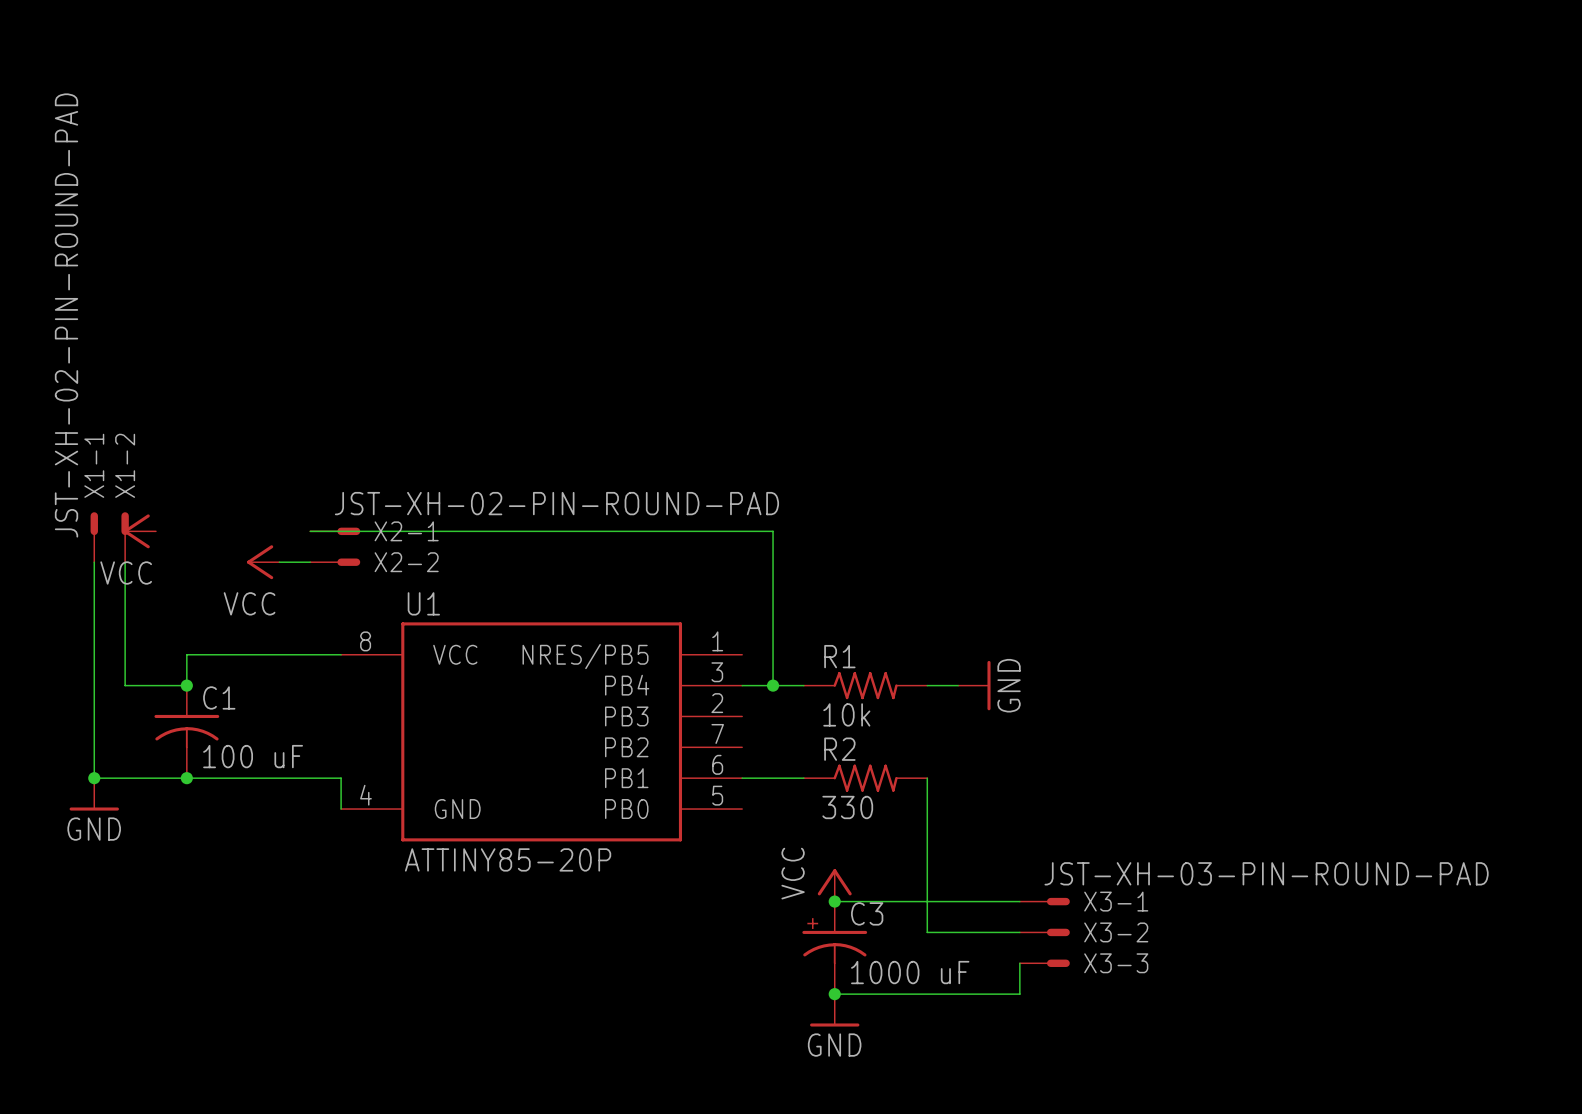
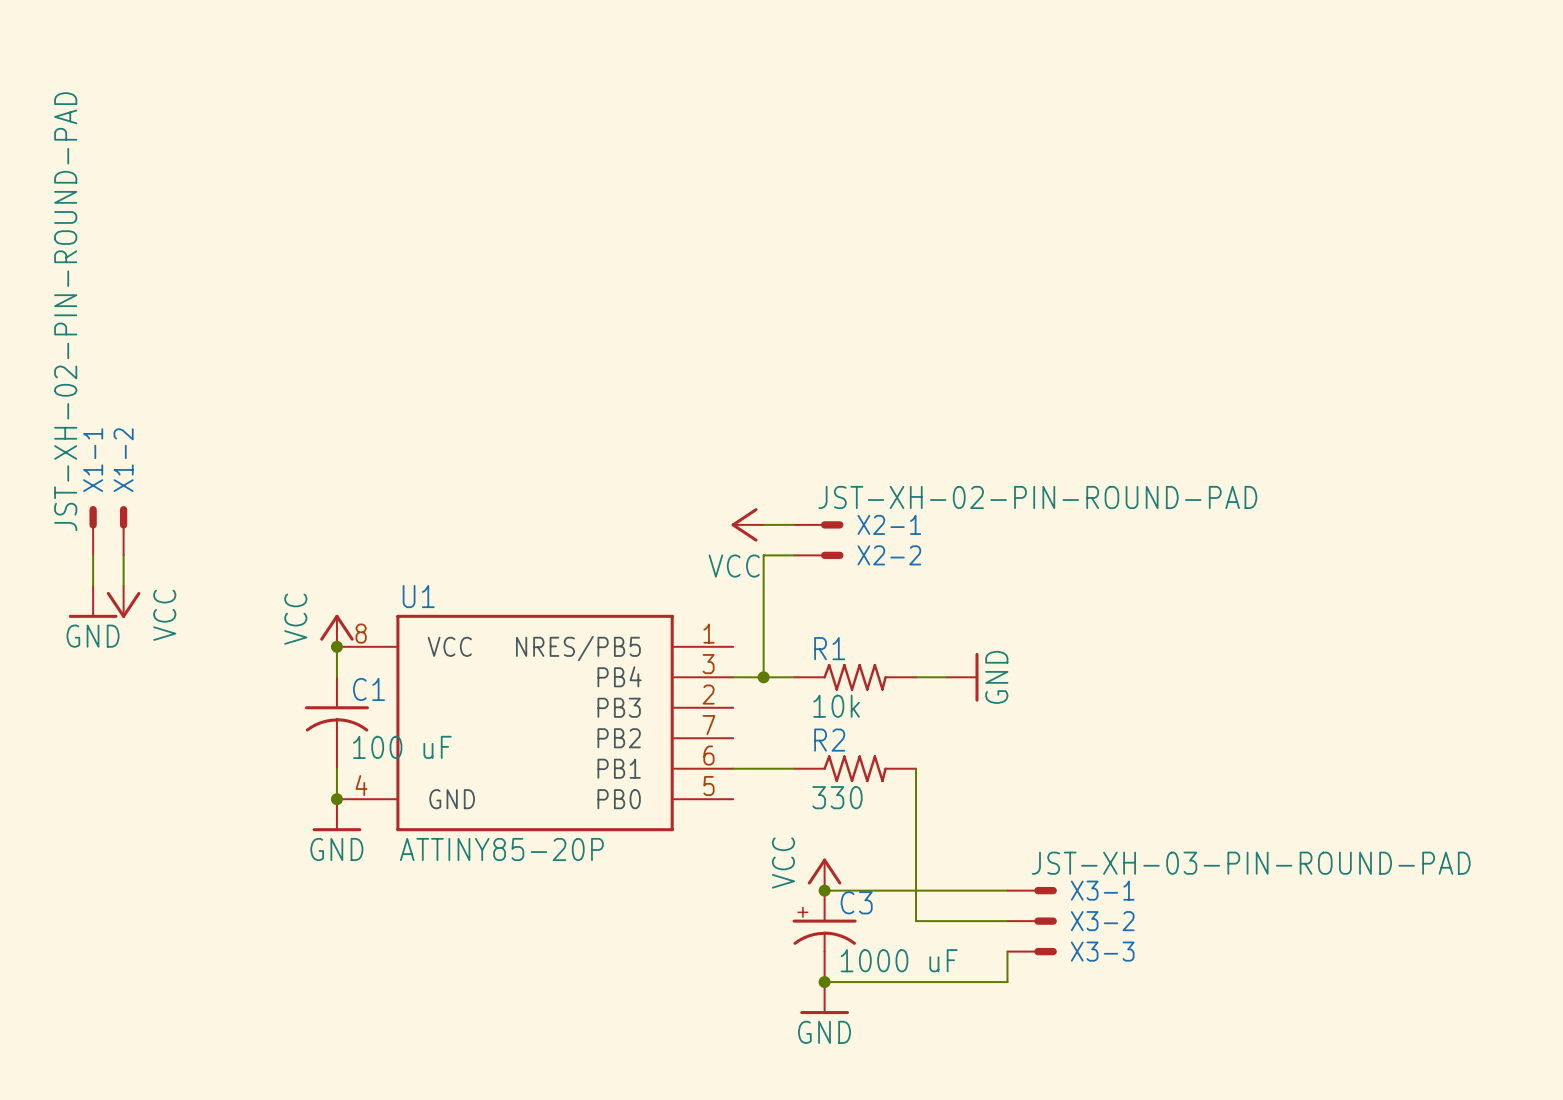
power symbol: VCC (139, 531) -> none
wire: (310, 531) (773, 531) (773, 562) -> (794, 555) (763, 555)
X2-1 position: (335, 531) -> (818, 524)
power symbol: none -> VCC (747, 524)
wire: none -> (763, 524) (794, 524)
power symbol: VCC (263, 562) -> none
wire: (279, 562) (310, 562) -> none
X2-2 position: (335, 562) -> (818, 555)
wire: (94, 593) (94, 778) (341, 778) -> none
wire: (125, 593) (125, 685) (186, 685) (186, 654) (341, 654) -> (336, 677) (336, 646)
power symbol: none -> GND (93, 601)
power symbol: none -> VCC (123, 601)
power symbol: none -> VCC (336, 630)
junction: none -> (336, 646)
junction: (186, 685) -> none
C1 position: (186, 731) -> (336, 723)
junction: (94, 778) -> none
junction: (186, 778) -> none
power symbol: GND (94, 794) -> none
junction: none -> (336, 799)
power symbol: none -> GND (336, 815)

